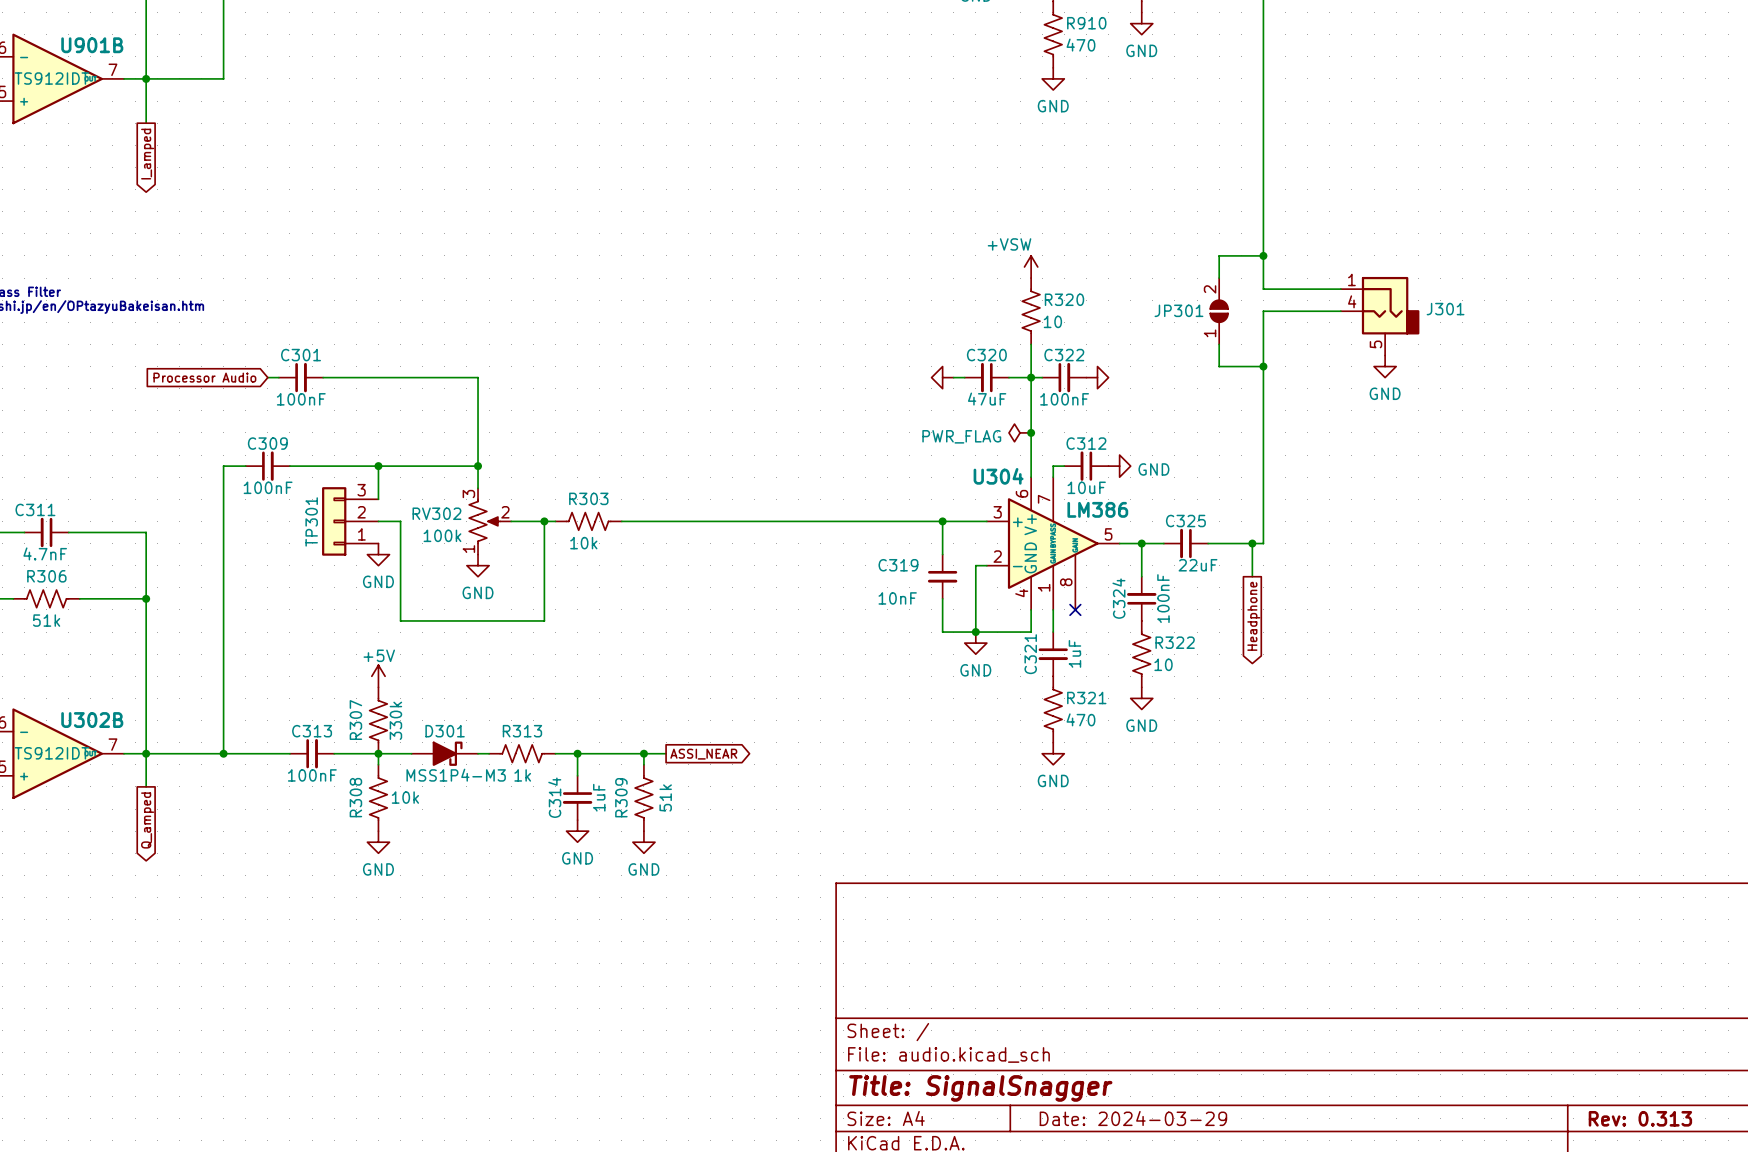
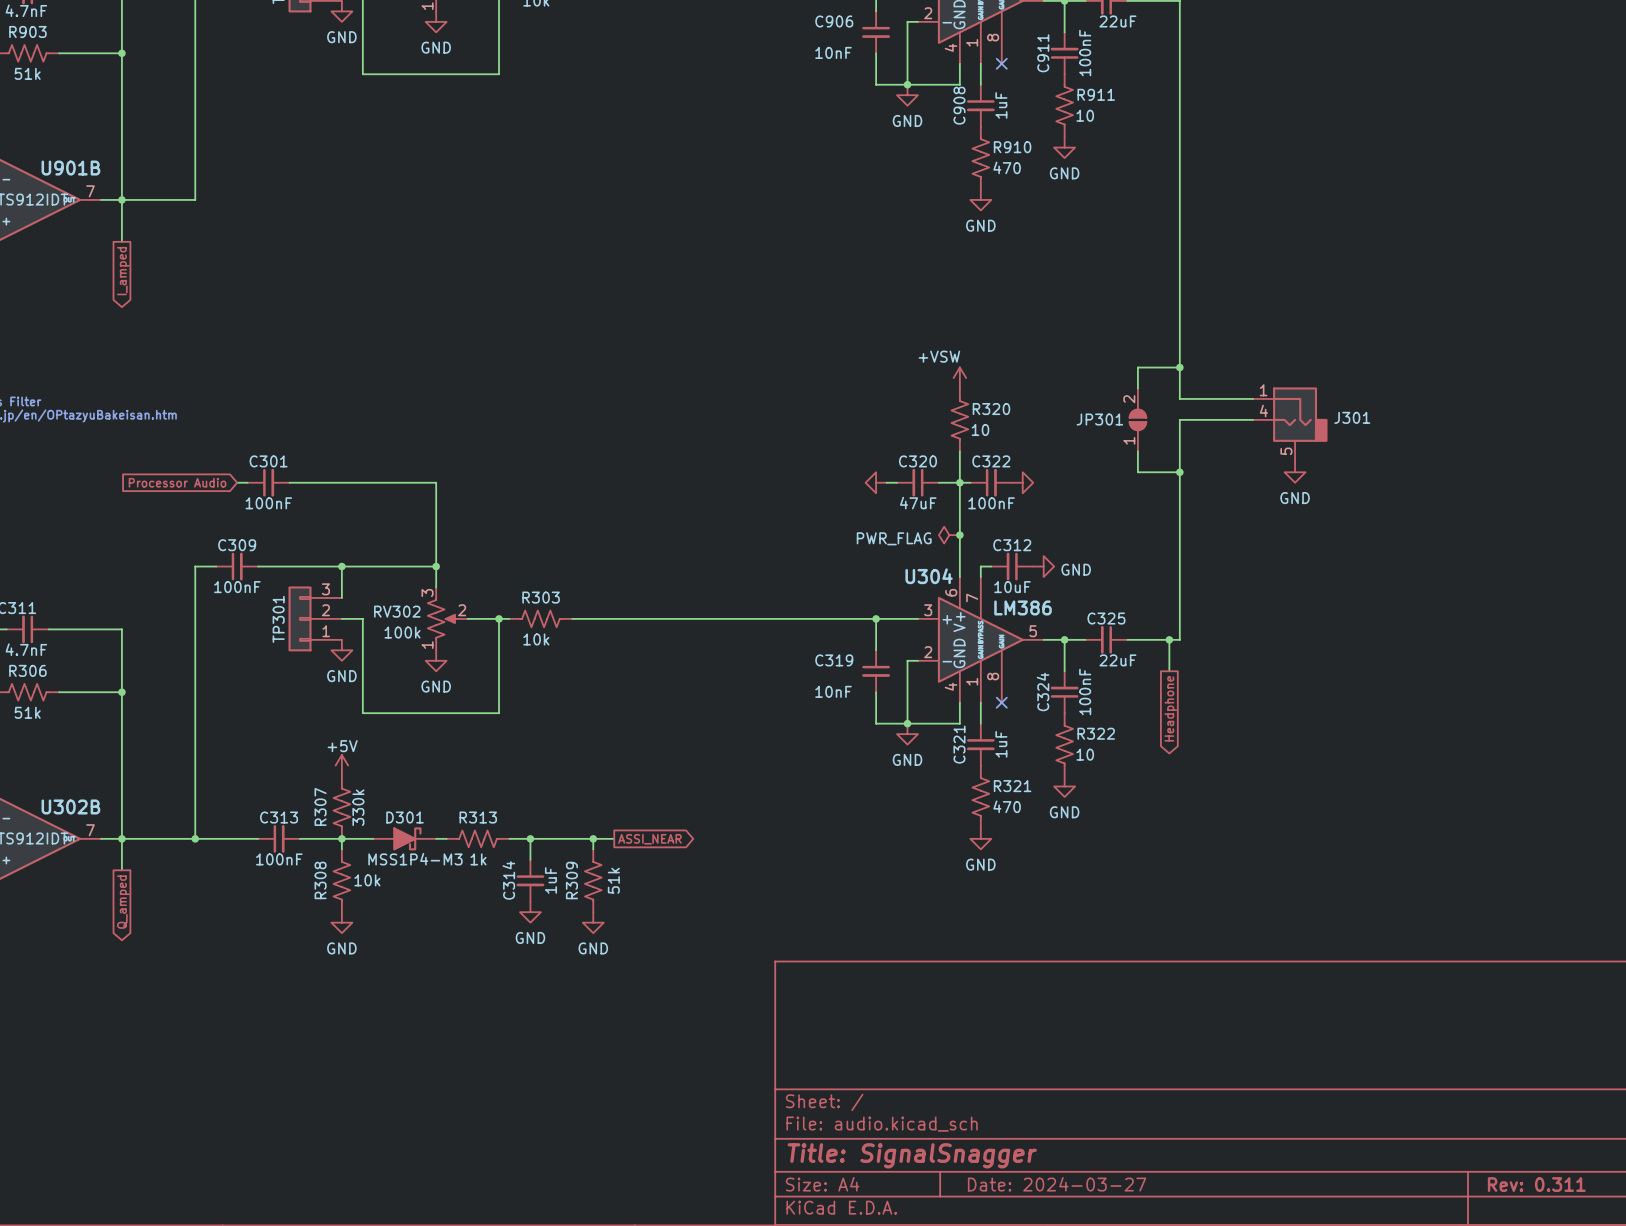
title block: Date: 2024-03-29 (1133, 1118) -> Date: 2024-03-27 (1057, 1184)
title block: Rev: 0.313 (1640, 1118) -> Rev: 0.311 (1536, 1184)

